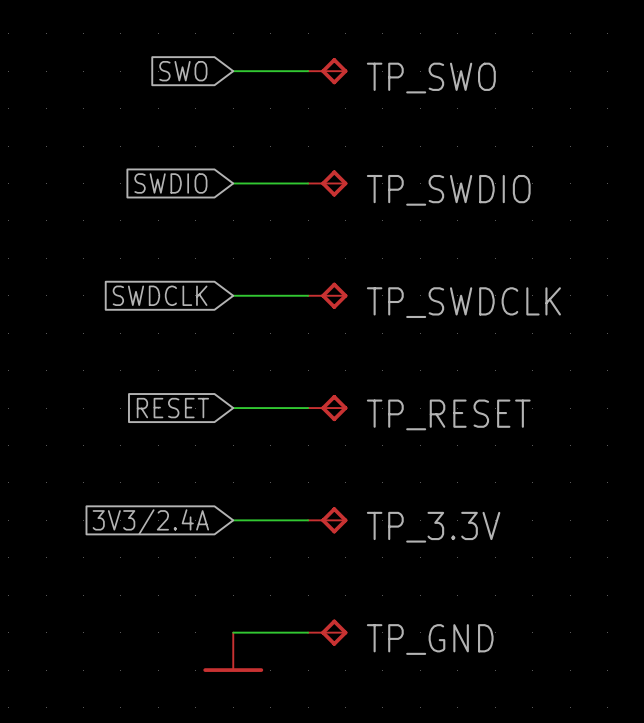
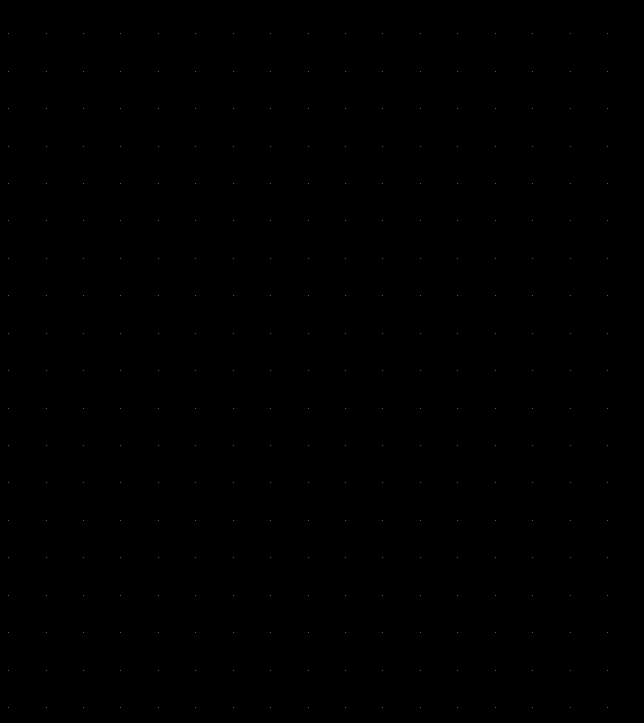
global label: SWO (183, 71) -> none
wire: (233, 71) (308, 71) -> none
TP_SWO: (327, 71) -> none
global label: SWDIO (170, 183) -> none
wire: (233, 183) (308, 183) -> none
TP_SWDIO: (327, 183) -> none
global label: SWDCLK (160, 295) -> none
wire: (233, 295) (308, 295) -> none
TP_SWDCLK: (327, 295) -> none
global label: RESET (172, 408) -> none
wire: (233, 408) (308, 408) -> none
TP_RESET: (327, 408) -> none
wire: (233, 520) (308, 520) -> none
TP_3.3V: (327, 520) -> none
global label: 3V3/2.4A (150, 522) -> none
wire: (233, 632) (308, 632) -> none
TP_GND: (327, 632) -> none
power symbol: (233, 652) -> none

